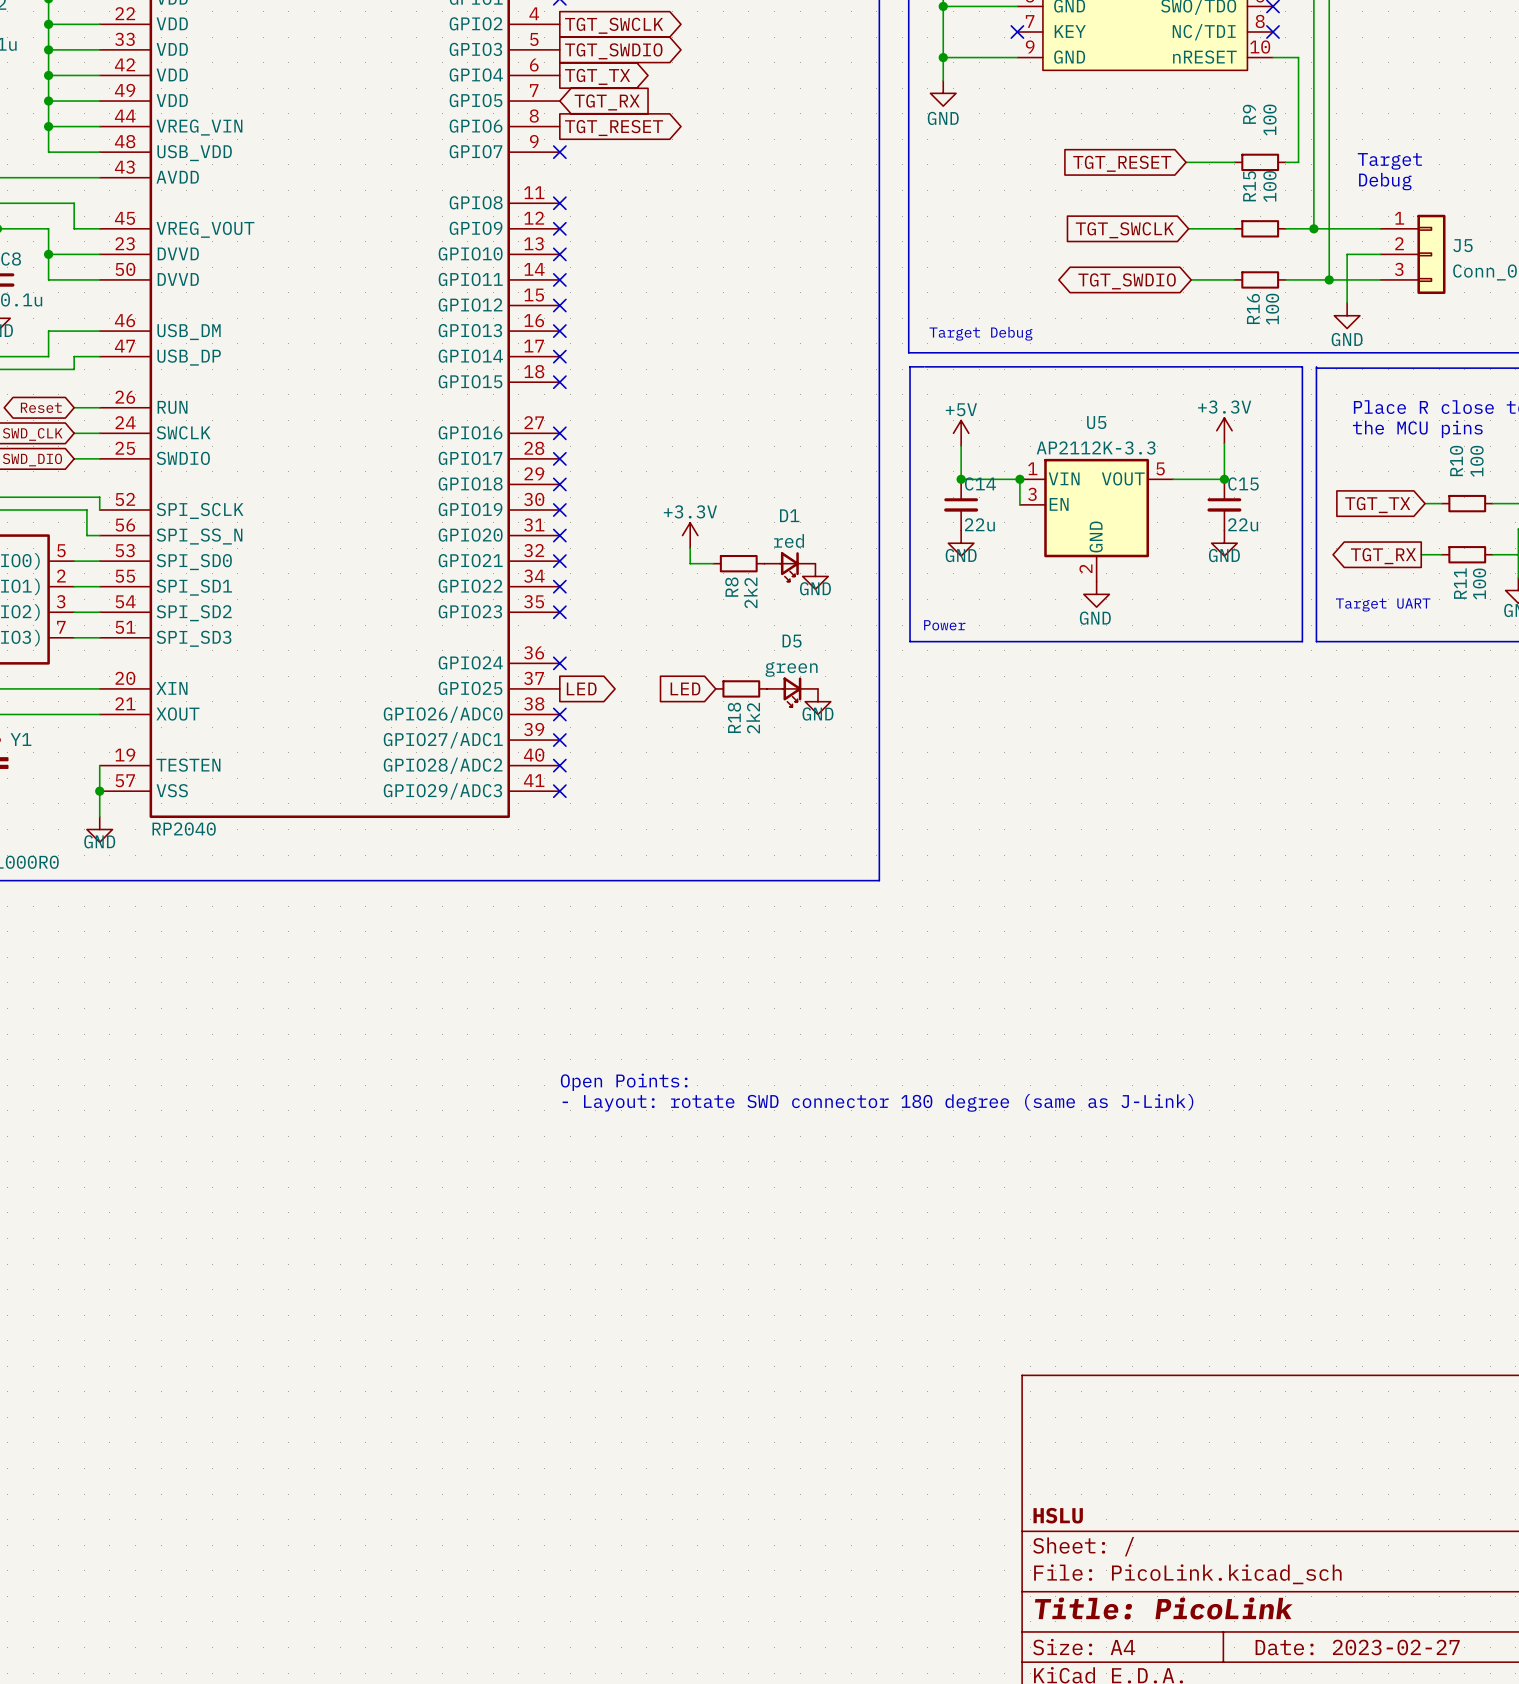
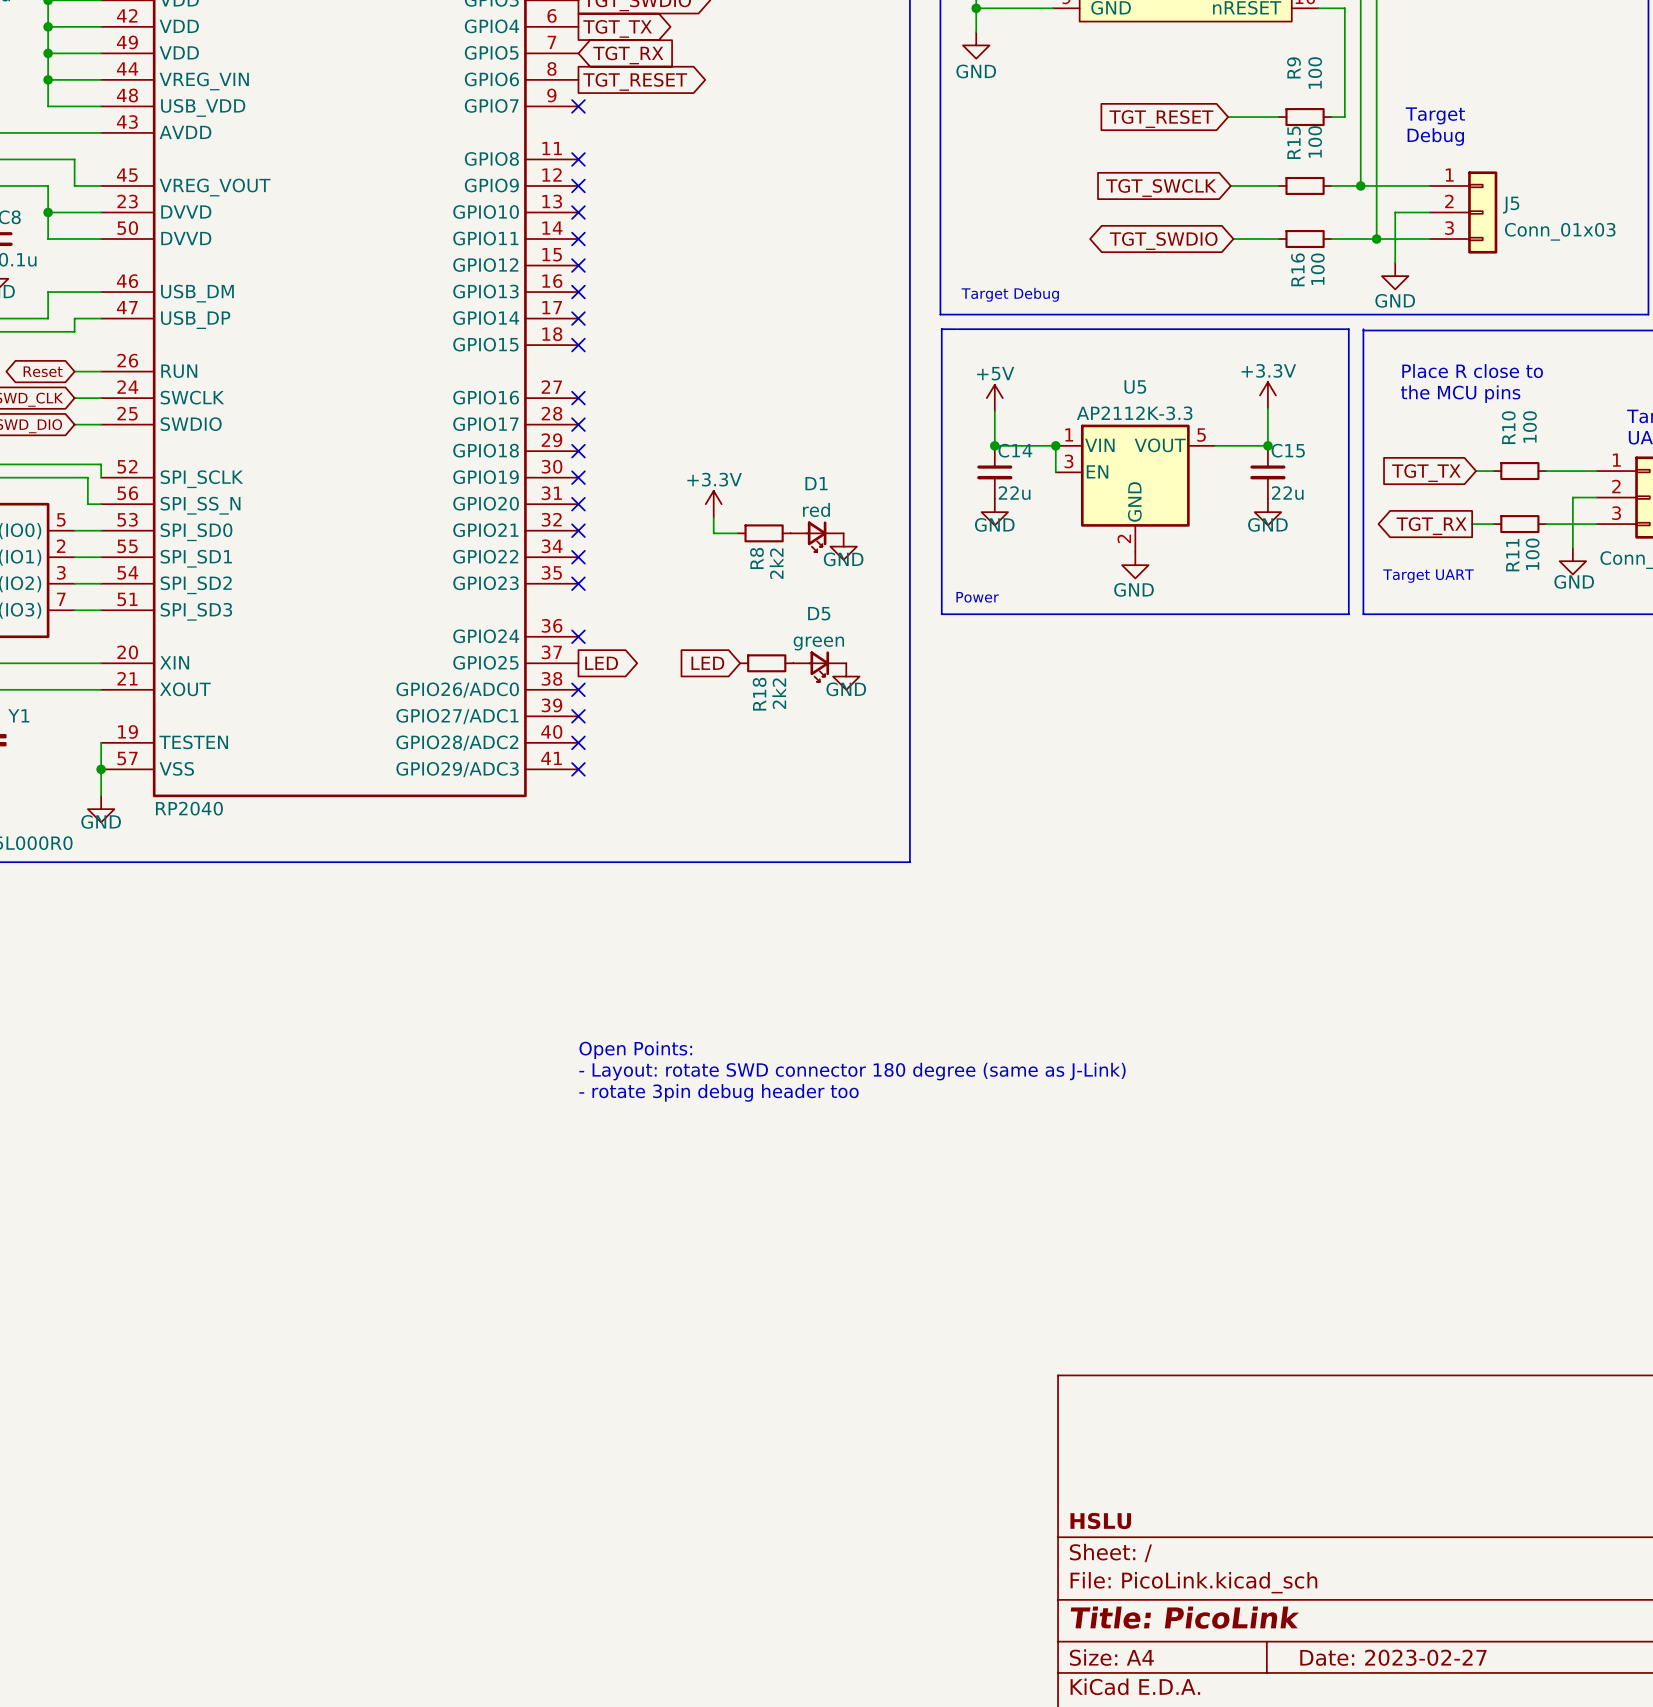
text: none -> Open Points: (635, 1050)
text: Open Points: (624, 1082) -> - Layout: rotate SWD connector 180 degree (same as J-Link) (852, 1071)
text: - Layout: rotate SWD connector 180 degree (same as J-Link) (877, 1102) -> - rotate 3pin debug header too (718, 1092)

